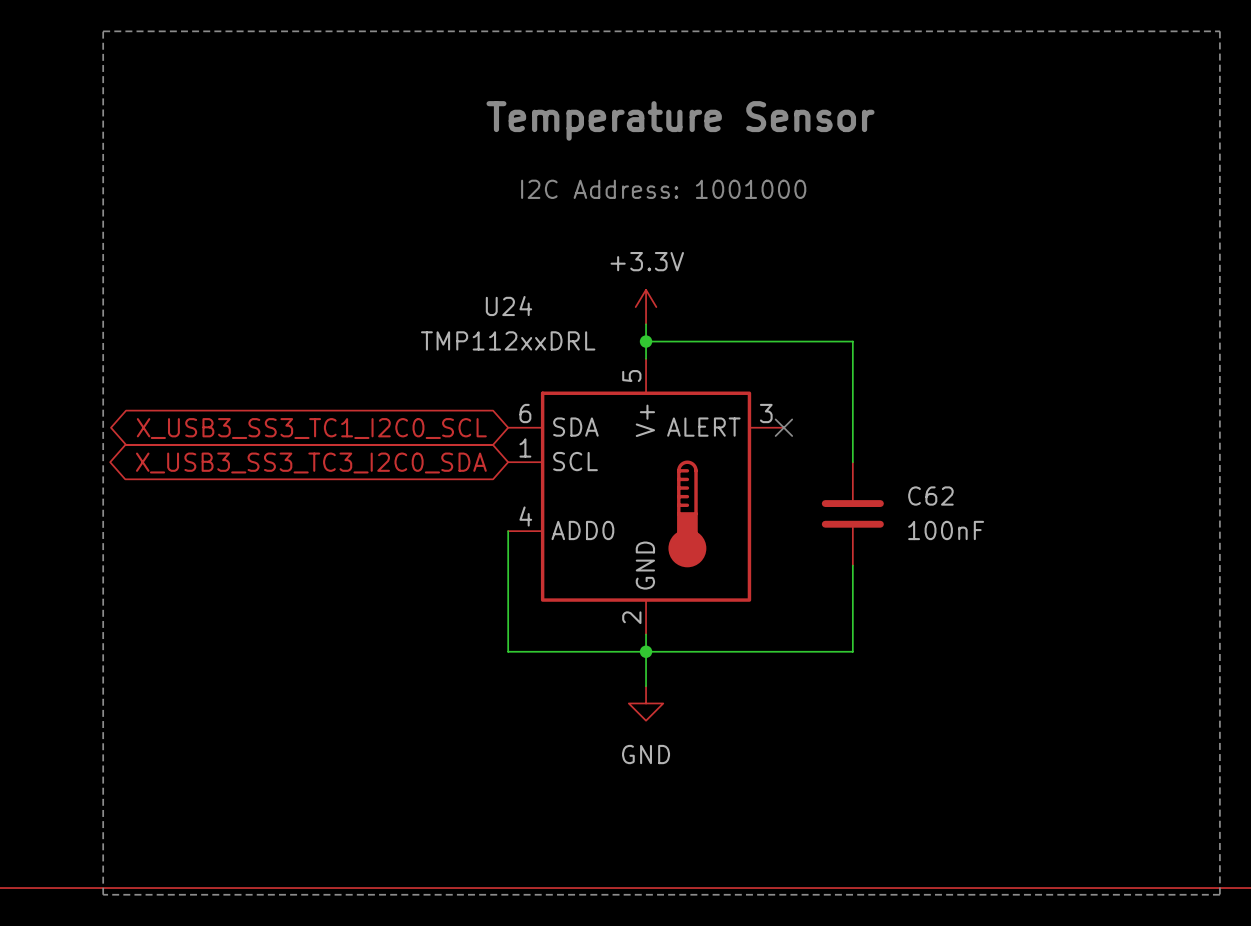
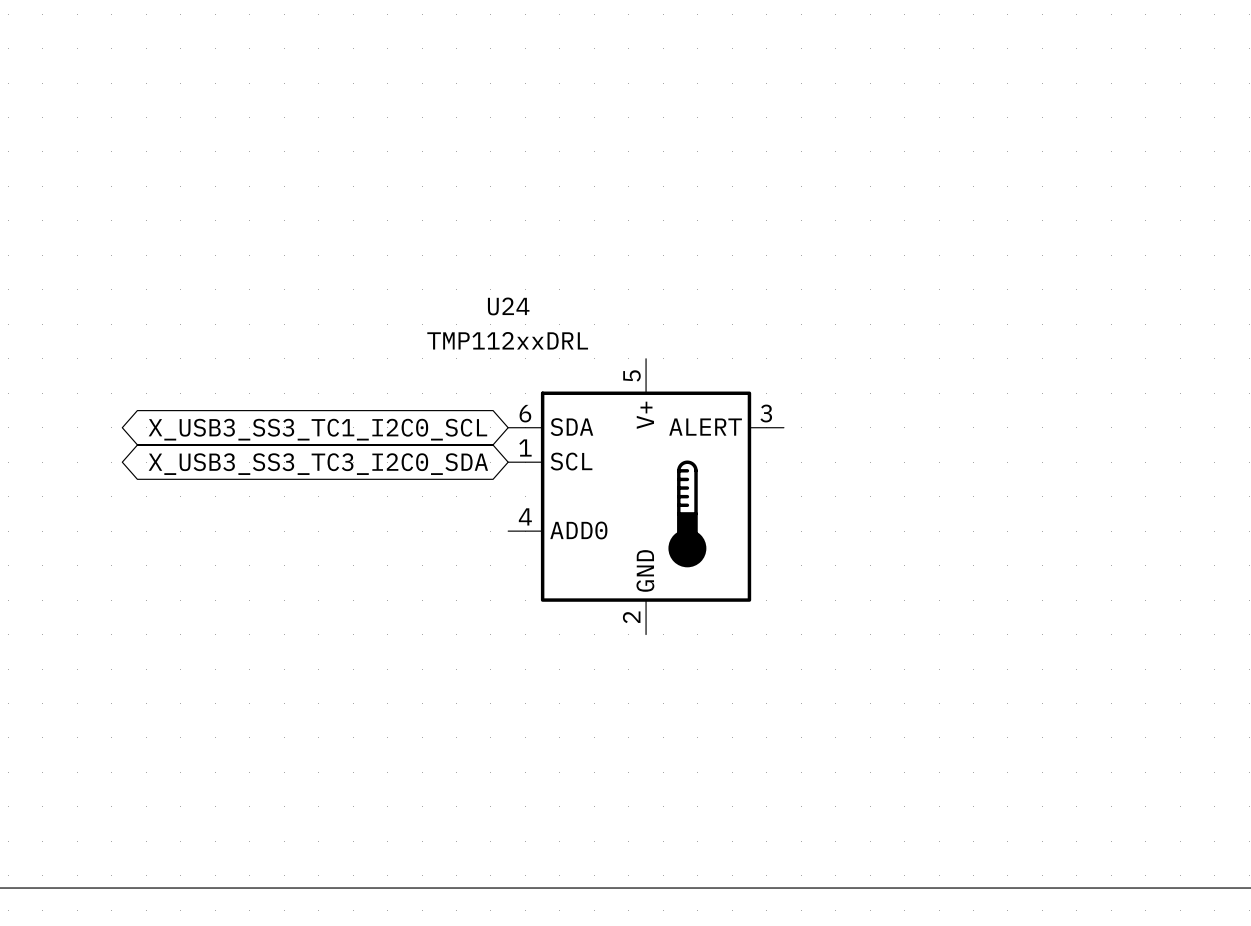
line: (103, 31) (1219, 31) (1219, 894) (103, 894) (103, 31) -> none
text: Temperature Sensor (680, 120) -> none
text: I2C Address: 1001000 (663, 189) -> none
power symbol: +3.3V (646, 307) -> none
wire: (646, 324) (646, 358) -> none
wire: (646, 341) (852, 341) (852, 462) -> none
junction: (646, 341) -> none
no-connect mark: (783, 427) -> none
C62: 100nF (852, 513) -> none
wire: (508, 531) (508, 651) (852, 651) (852, 565) -> none
wire: (646, 634) (646, 686) -> none
junction: (646, 651) -> none
power symbol: GND (646, 703) -> none

